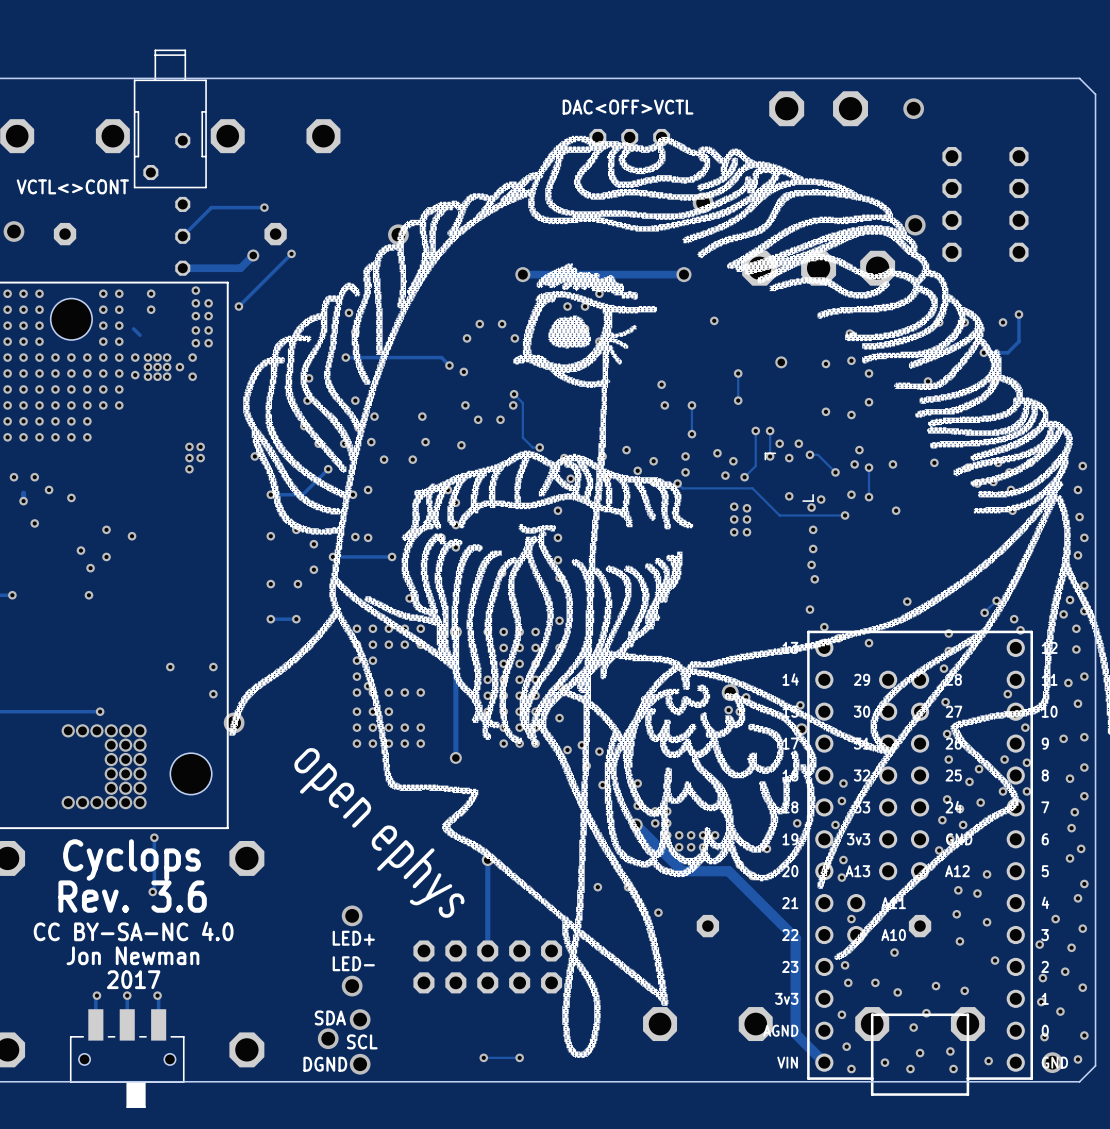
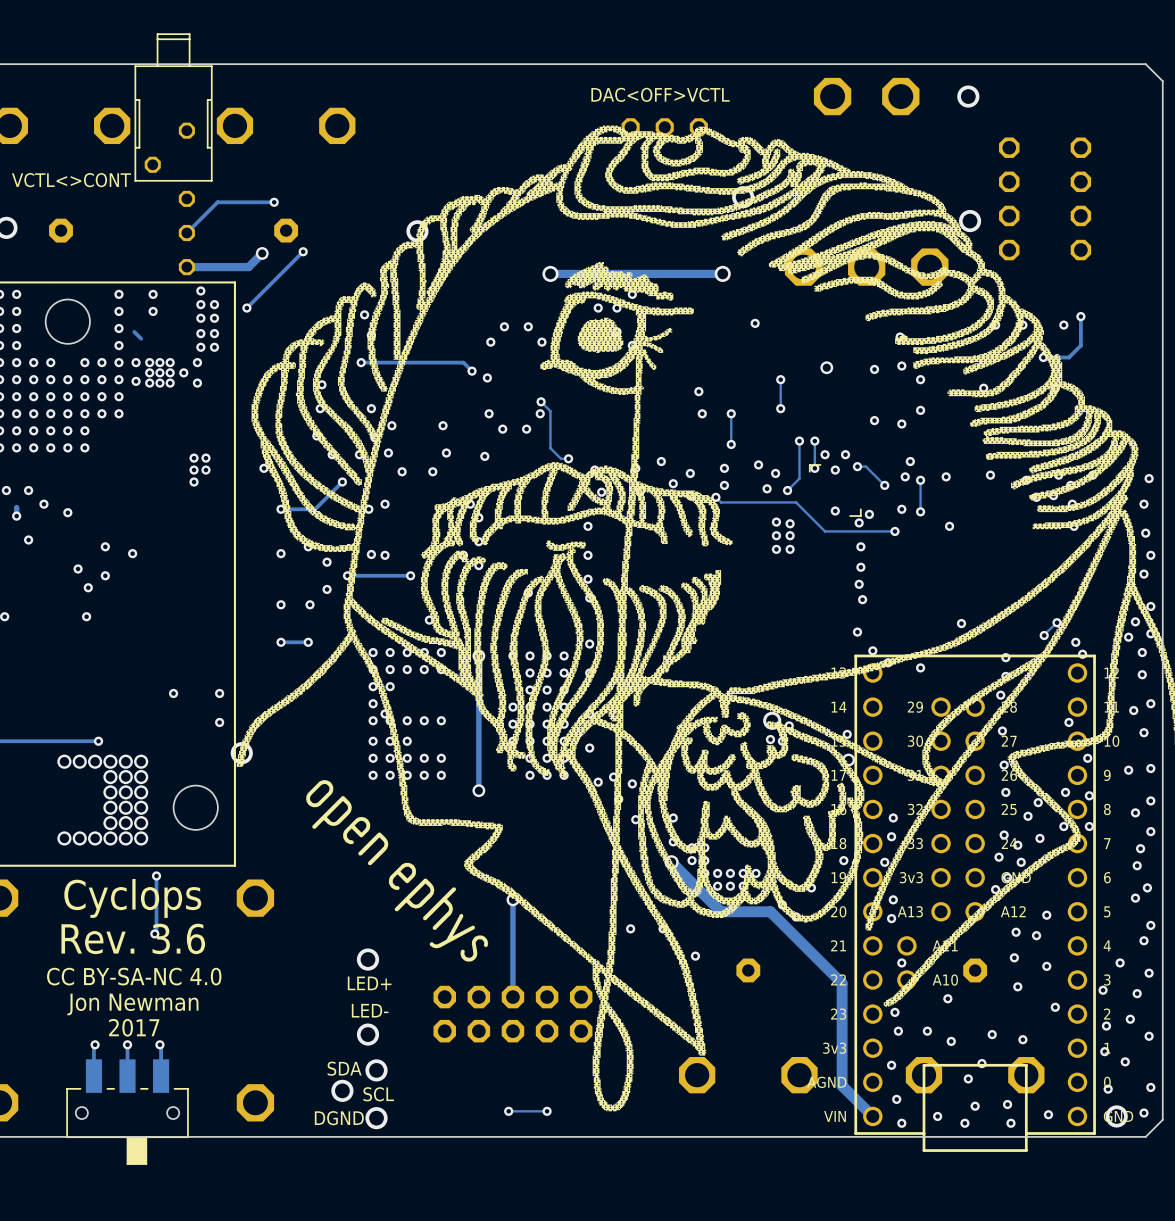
via: (39, 293) -> none
via: (103, 293) -> none
via: (39, 309) -> none
via: (103, 309) -> none
via: (39, 325) -> none
via: (103, 325) -> none
via: (39, 341) -> none
via: (103, 341) -> none
via: (71, 357) -> none

